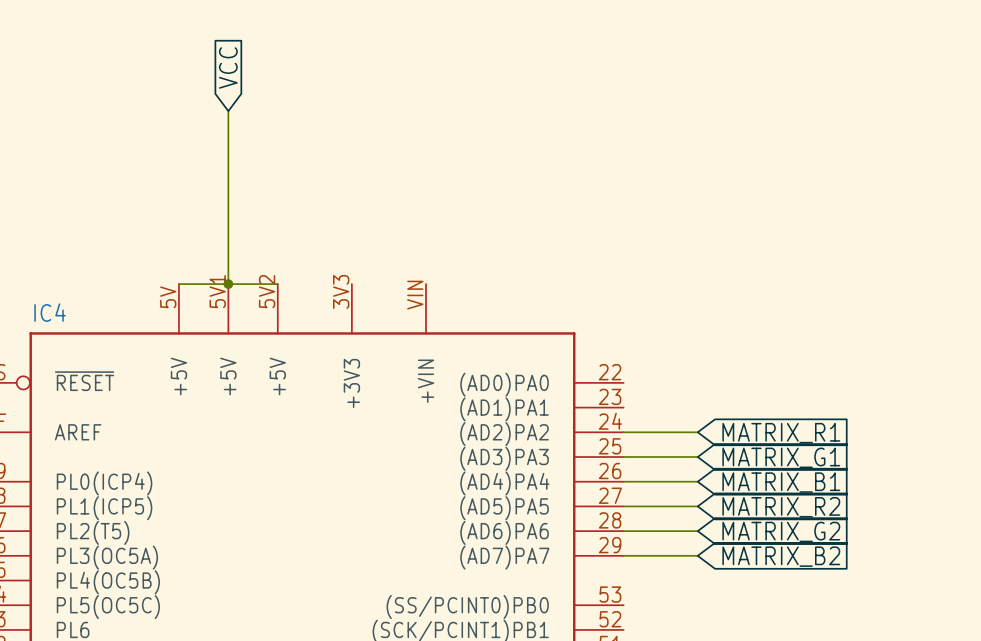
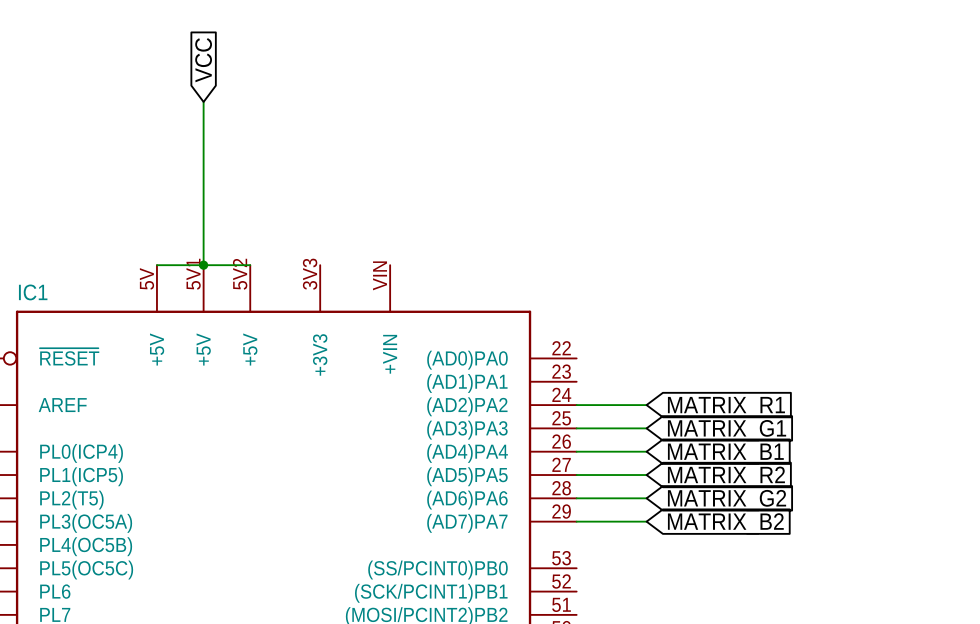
IC4 name: IC4 (50, 312) -> IC1 (33, 292)

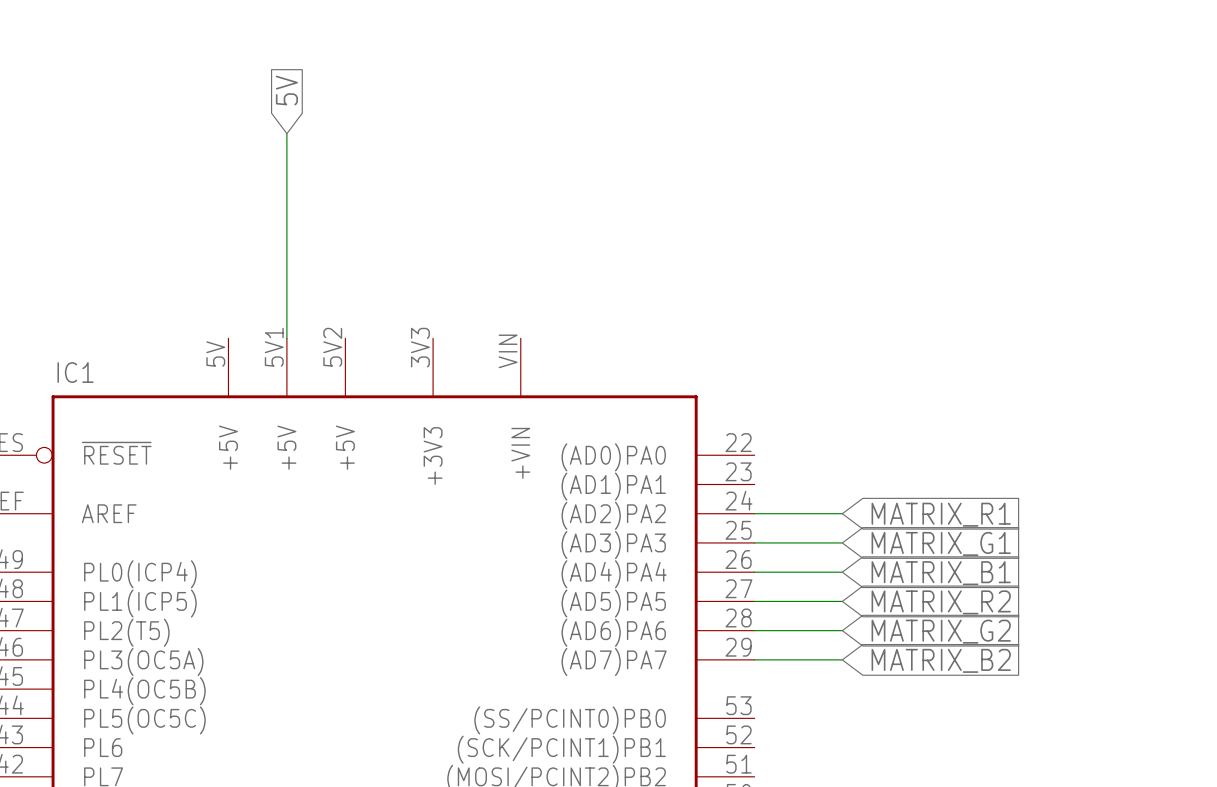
global label: VCC (203, 60) -> 5V (286, 90)
wire: (156, 265) (250, 265) -> none
junction: (203, 265) -> none

